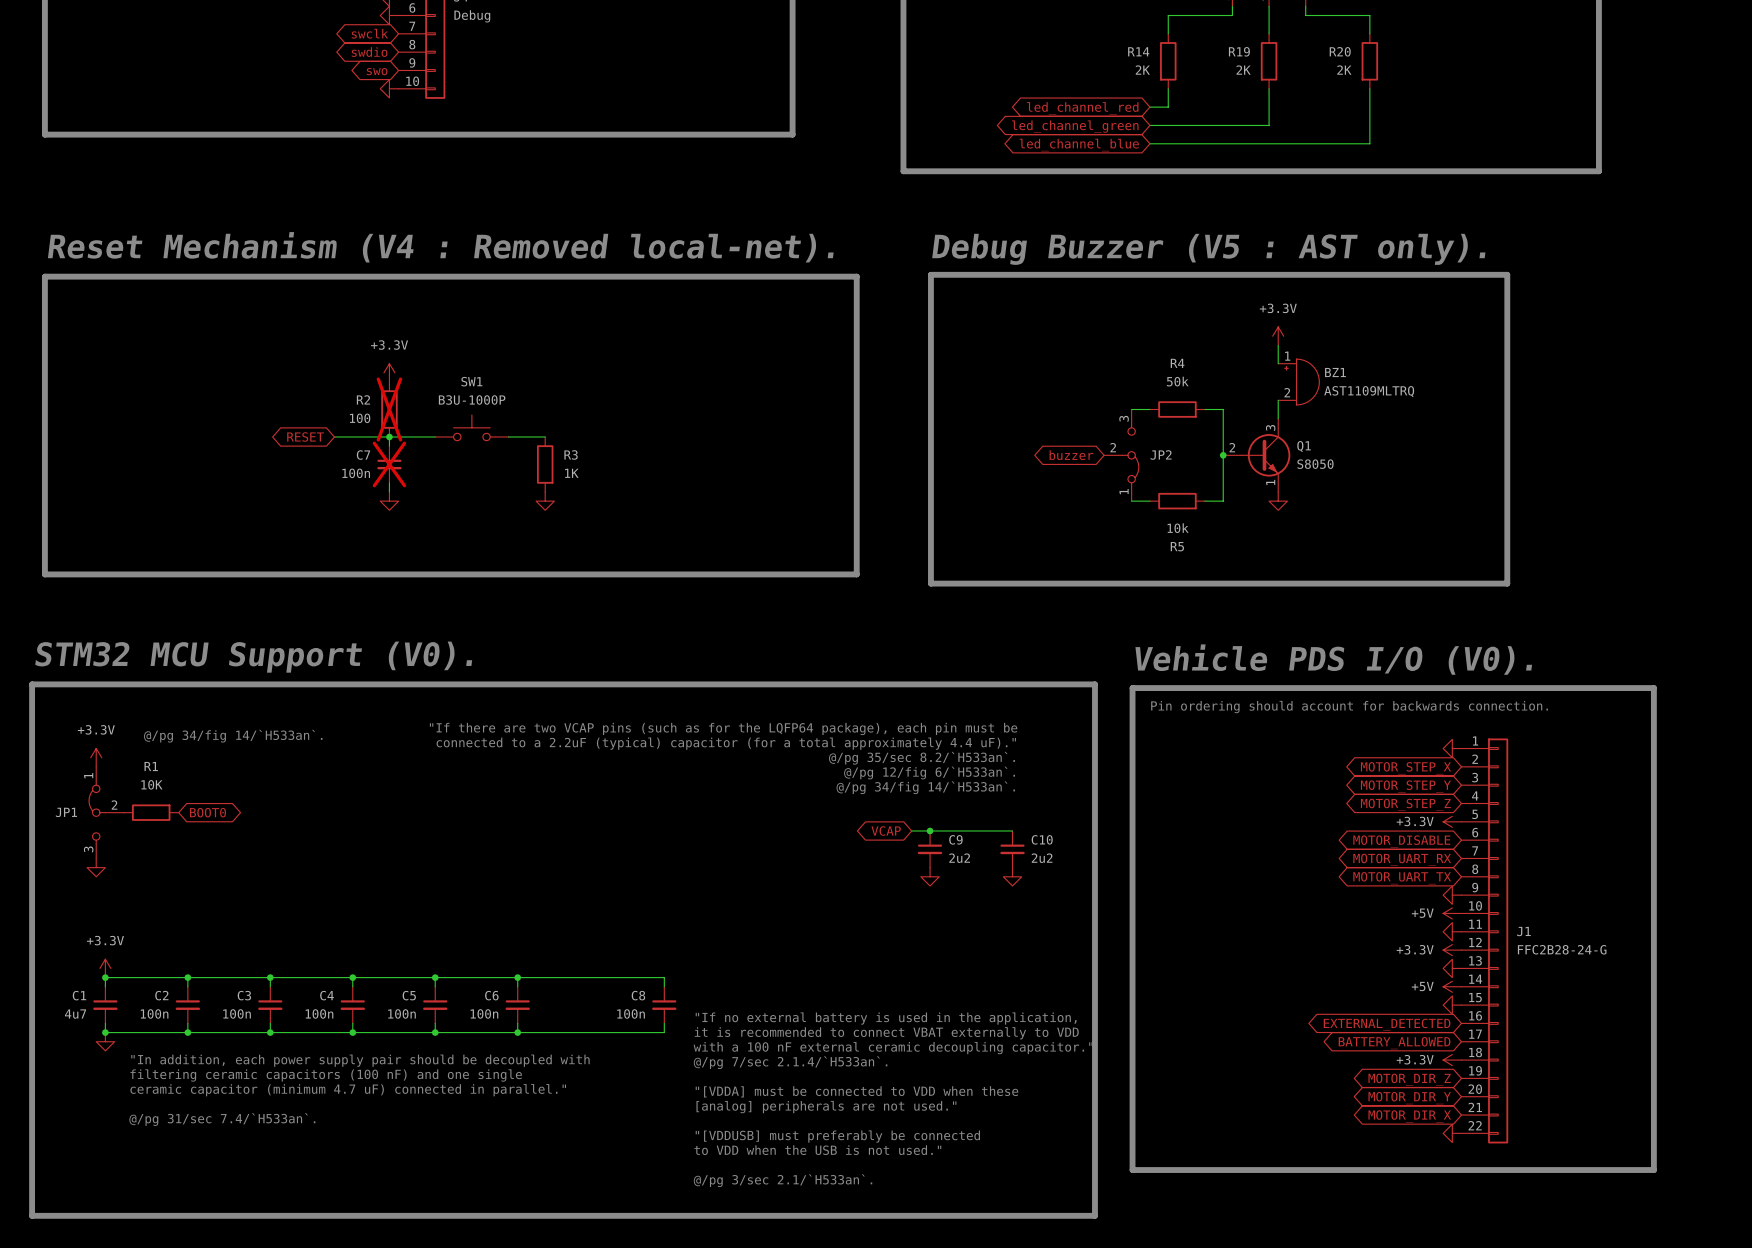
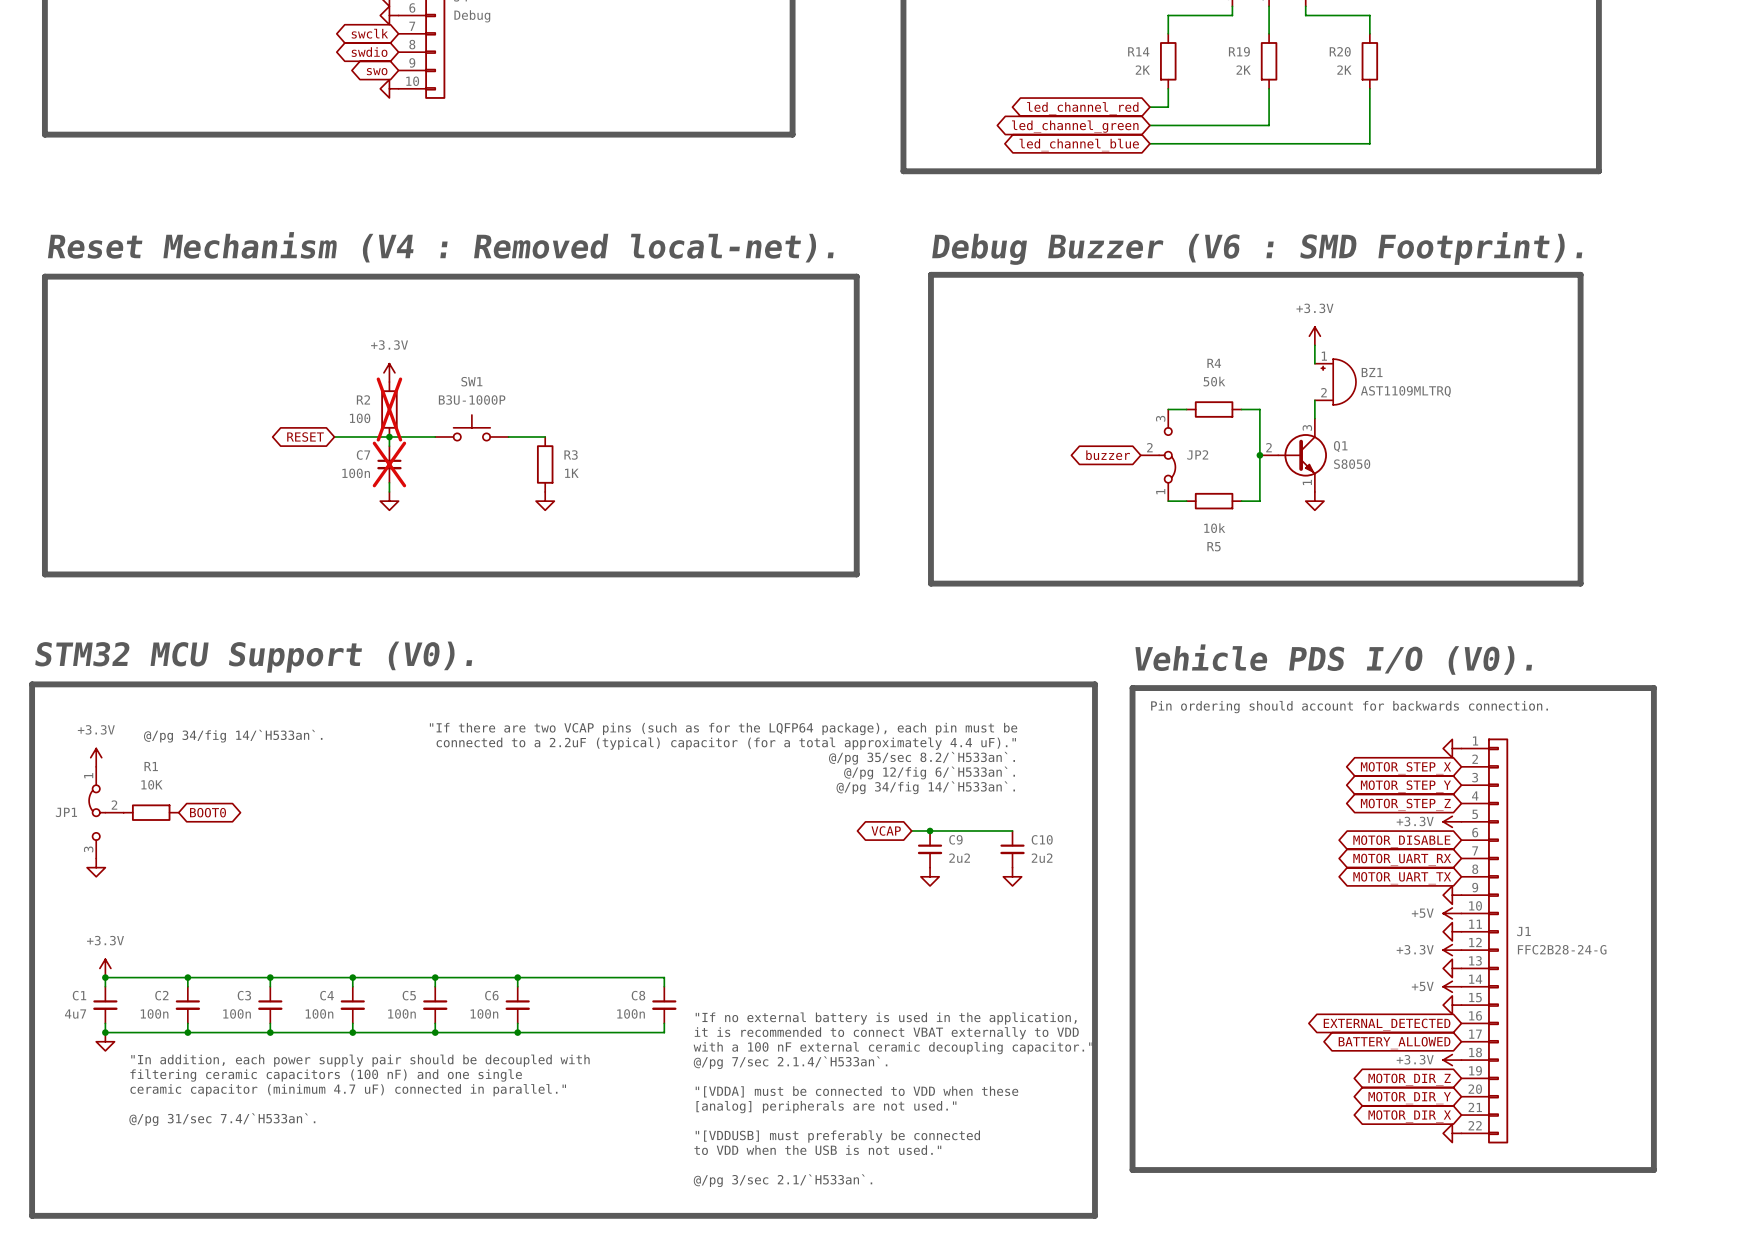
text: Debug Buzzer (V5 : AST only). (1208, 249) -> Debug Buzzer (V6 : SMD Footprint). (1257, 248)
line: (1507, 274) (1507, 583) -> (1507, 274) (1580, 274) (1580, 583) (1507, 583)
power symbol position: +3.3V (1278, 336) -> +3.3V (1314, 336)
wire: (1278, 345) (1278, 363) -> (1314, 345) (1314, 363)
BZ1 position: (1298, 382) -> (1335, 382)
wire: (1278, 400) (1278, 418) -> (1314, 400) (1314, 418)
wire: (1131, 409) (1149, 409) -> (1168, 409) (1186, 409)
R4 position: (1177, 409) -> (1214, 409)
wire: (1204, 409) (1223, 409) (1223, 501) (1204, 501) -> (1241, 409) (1259, 409) (1259, 501) (1241, 501)
global label position: buzzer (1071, 455) -> buzzer (1108, 455)
JP2 position: (1121, 455) -> (1158, 455)
junction position: (1223, 455) -> (1259, 455)
Q1 position: (1256, 455) -> (1293, 455)
wire: (1131, 501) (1149, 501) -> (1168, 501) (1186, 501)
R5 position: (1177, 501) -> (1214, 501)
power symbol position: (1278, 501) -> (1314, 501)

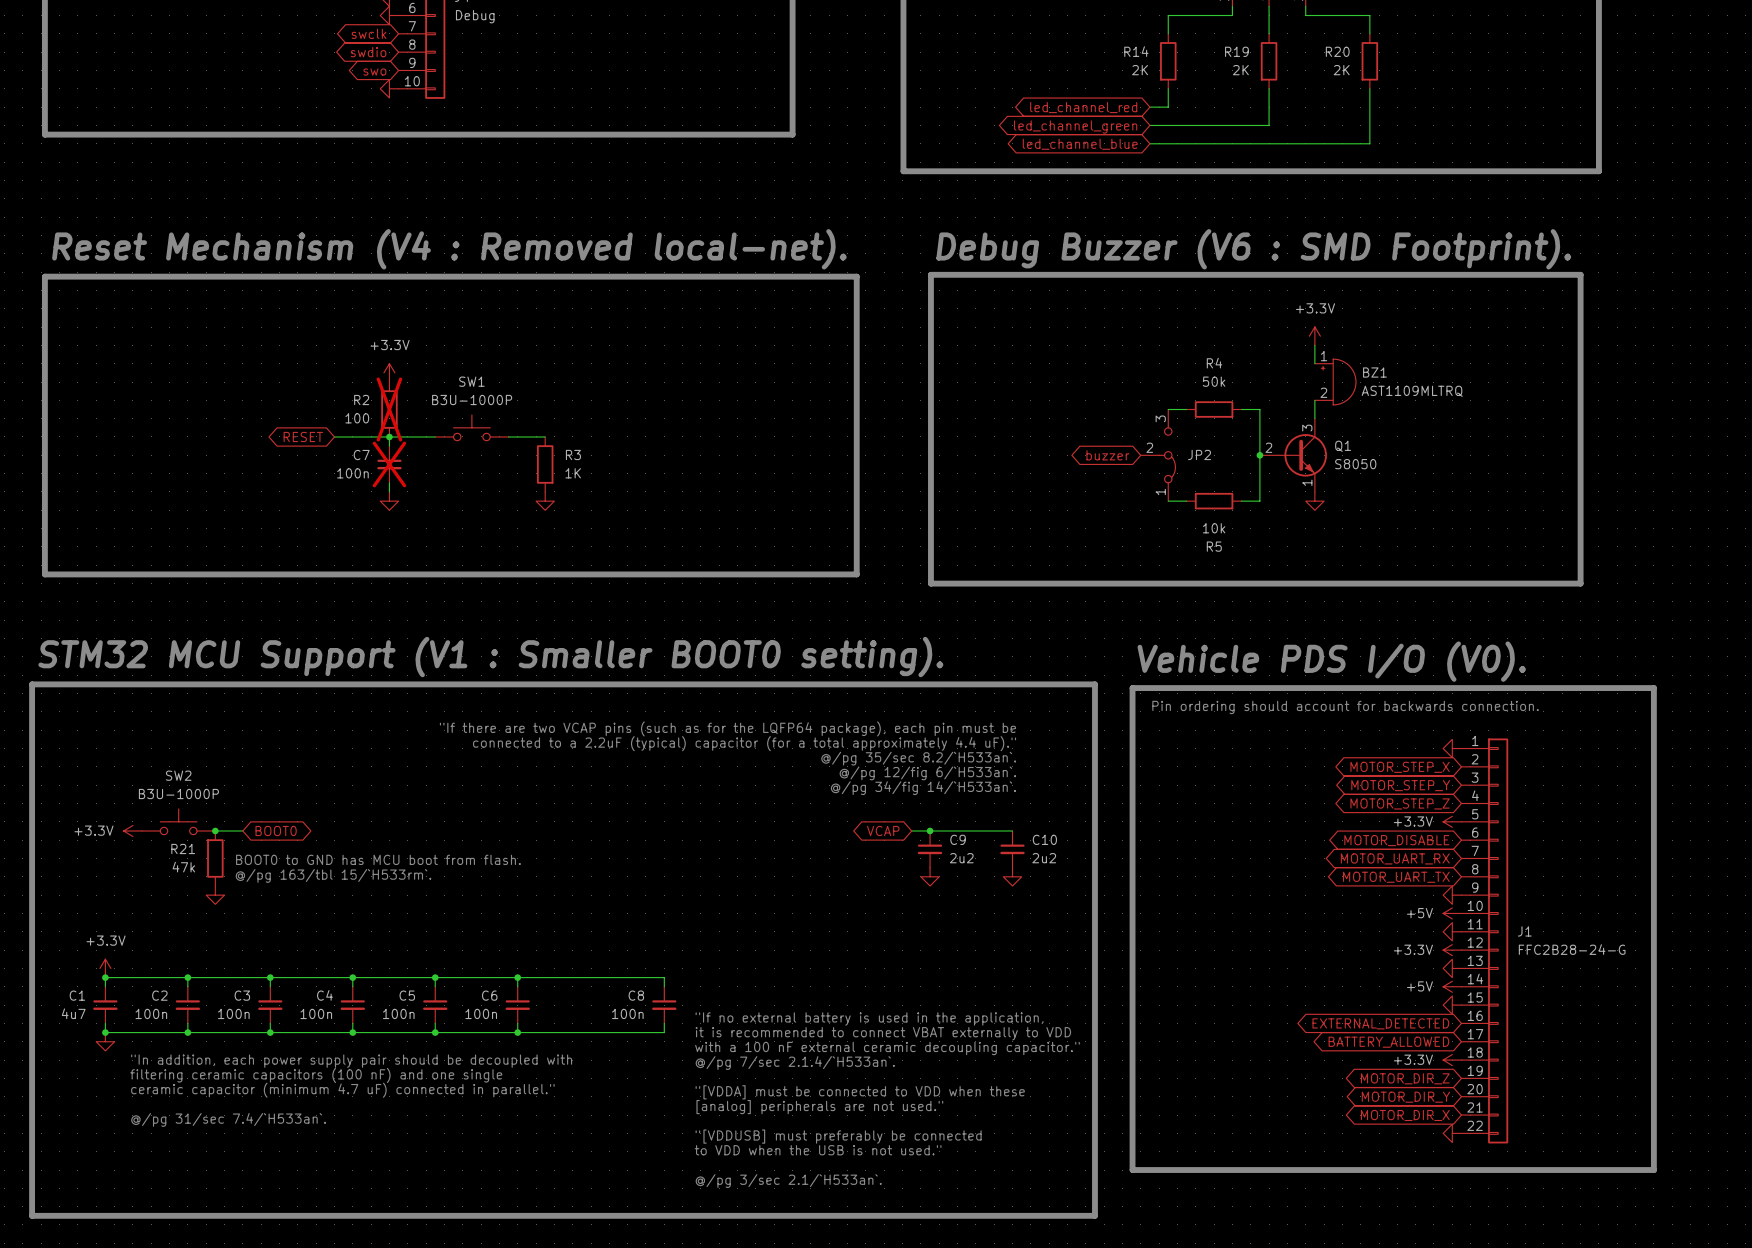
text: STM32 MCU Support (V0). (253, 657) -> STM32 MCU Support (V1 : Smaller BOOT0 setting). (490, 657)
power symbol text position: +3.3V (96, 729) -> +3.3V (93, 830)
text: @/pg 34/fig 14/`H533an`. (233, 736) -> none
power symbol rotation: 0° (96, 757) -> 90° counterclockwise (132, 830)
power symbol position: +3.3V (96, 757) -> +3.3V (132, 830)
JP1: (106, 812) -> none
R1: 10K (151, 812) -> none
global label position: BOOT0 (208, 812) -> BOOT0 (276, 830)
SW2: none -> B3U-1000P (178, 821)
wire: none -> (215, 830) (242, 830)
junction: none -> (215, 830)
R21: none -> 47k (215, 858)
text: none -> BOOT0 to GND has MCU boot from flash. (378, 859)
power symbol position: (96, 867) -> (215, 895)
text: none -> @/pg 163/tbl 15/`H533rm`. (333, 875)

